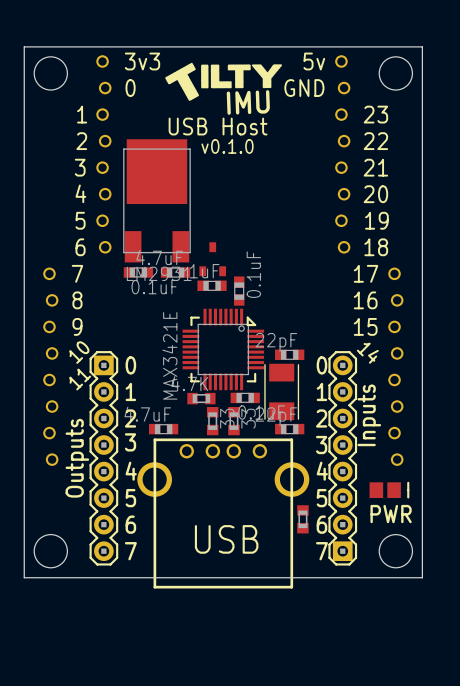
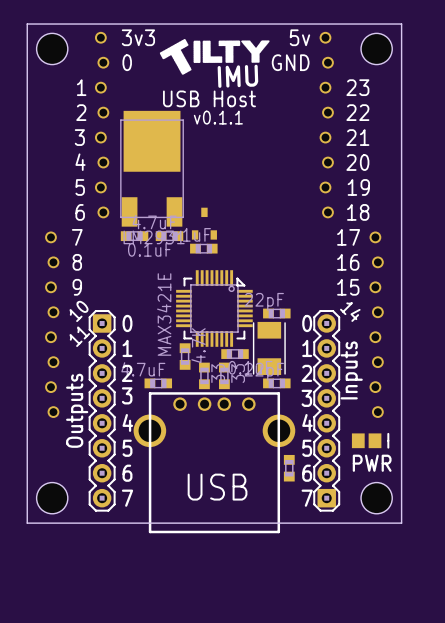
text: v0.1.0 (227, 146) -> v0.1.1 (218, 117)
part: 0.1uF (239, 291) -> none
part rotation: 0° (201, 398) -> 90° clockwise (185, 356)

